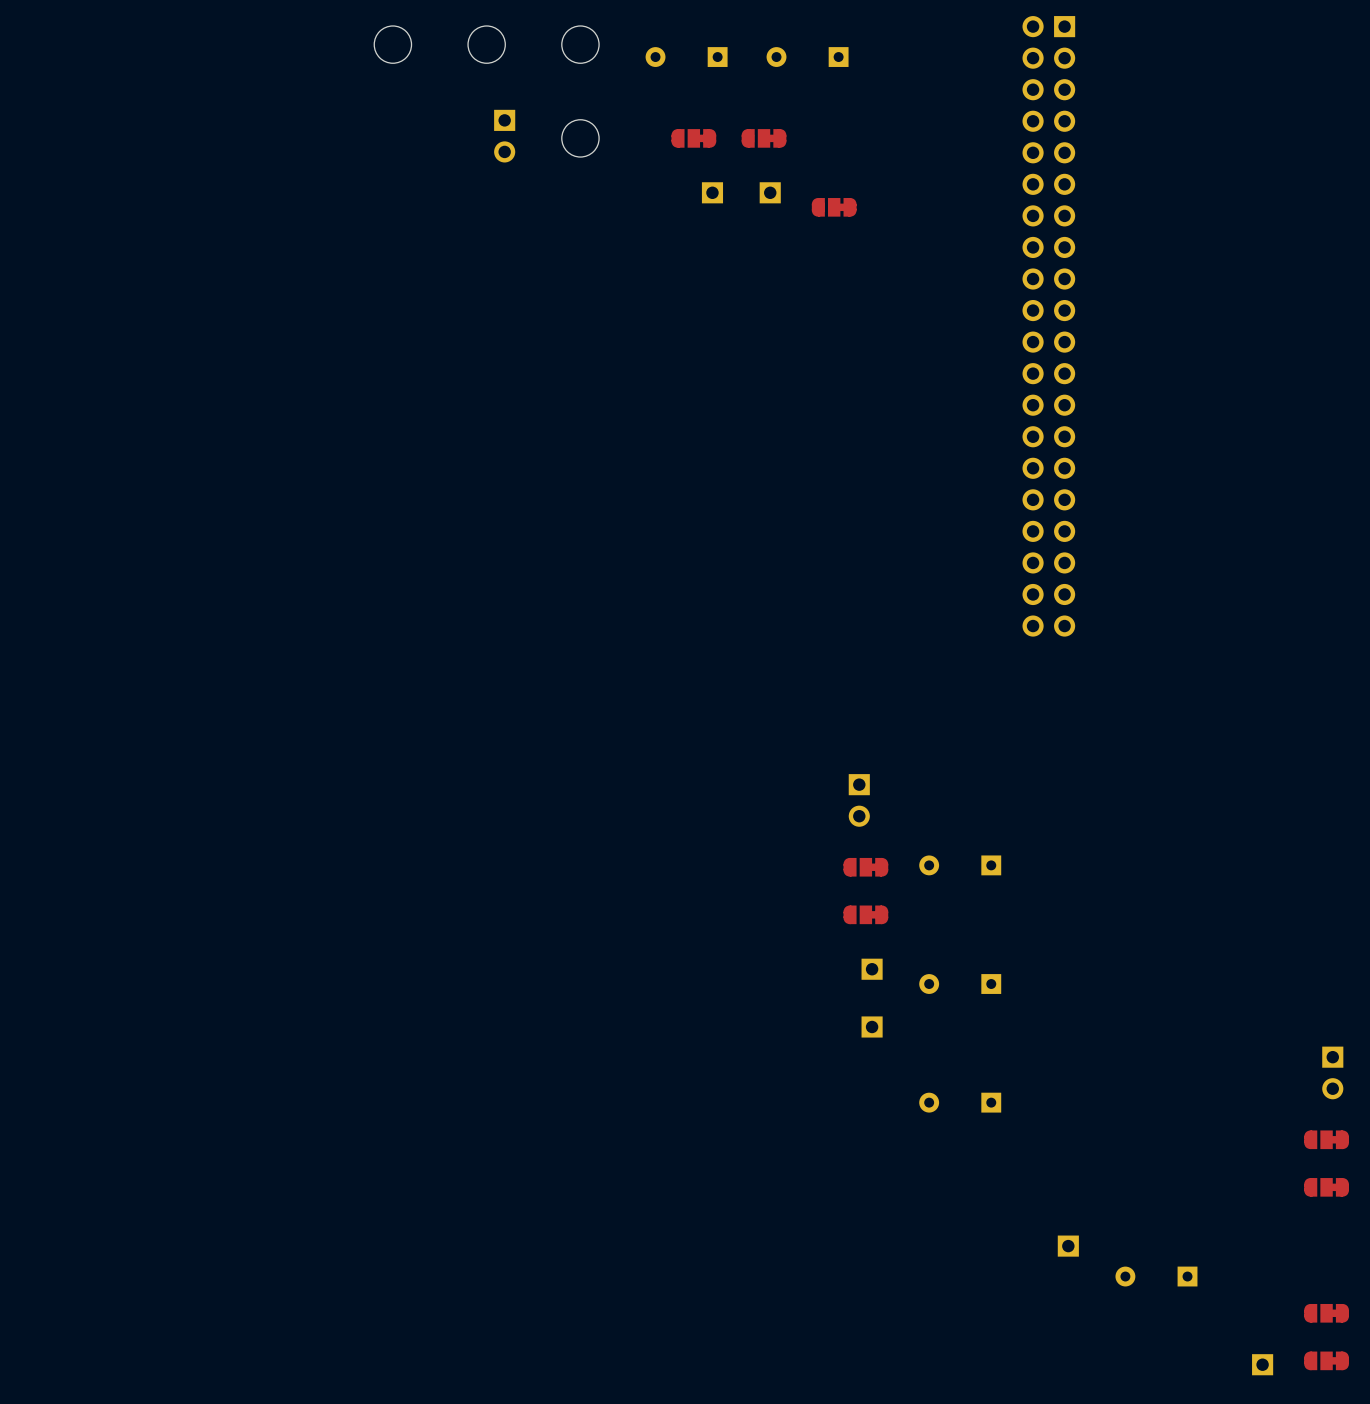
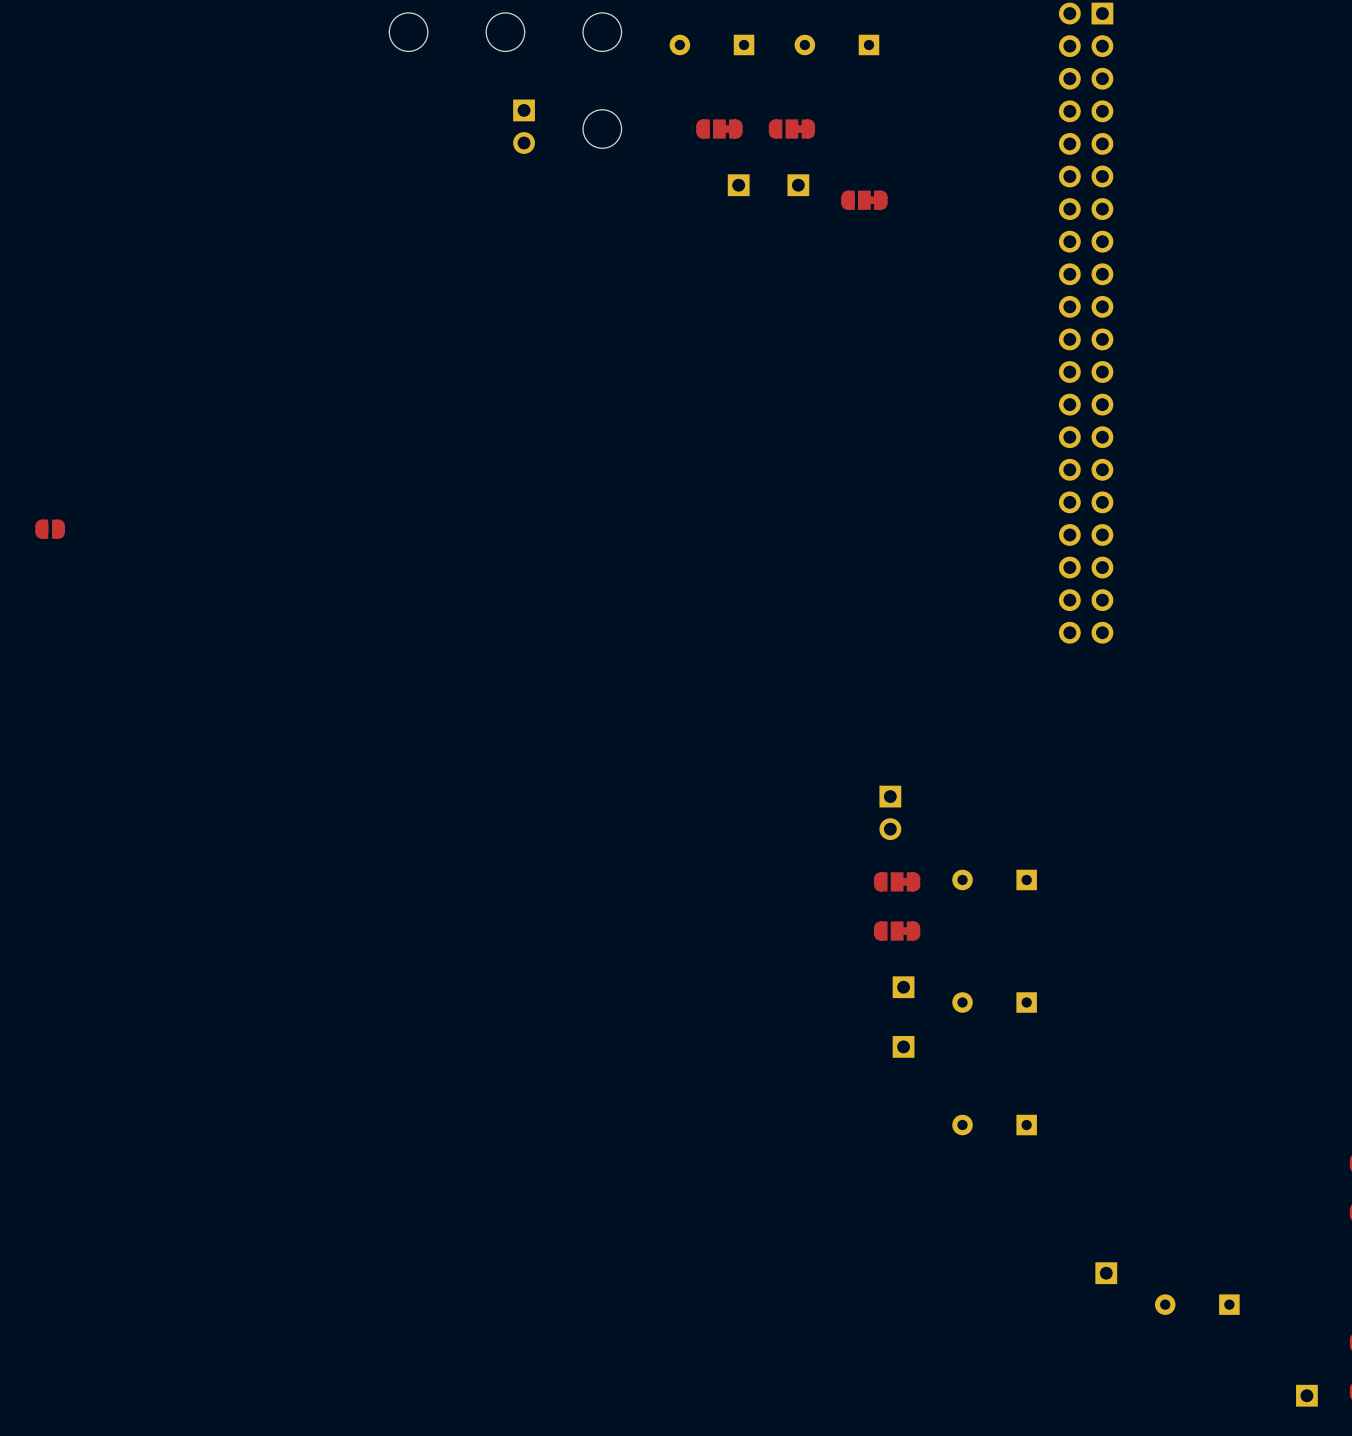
part: none -> (50, 529)

